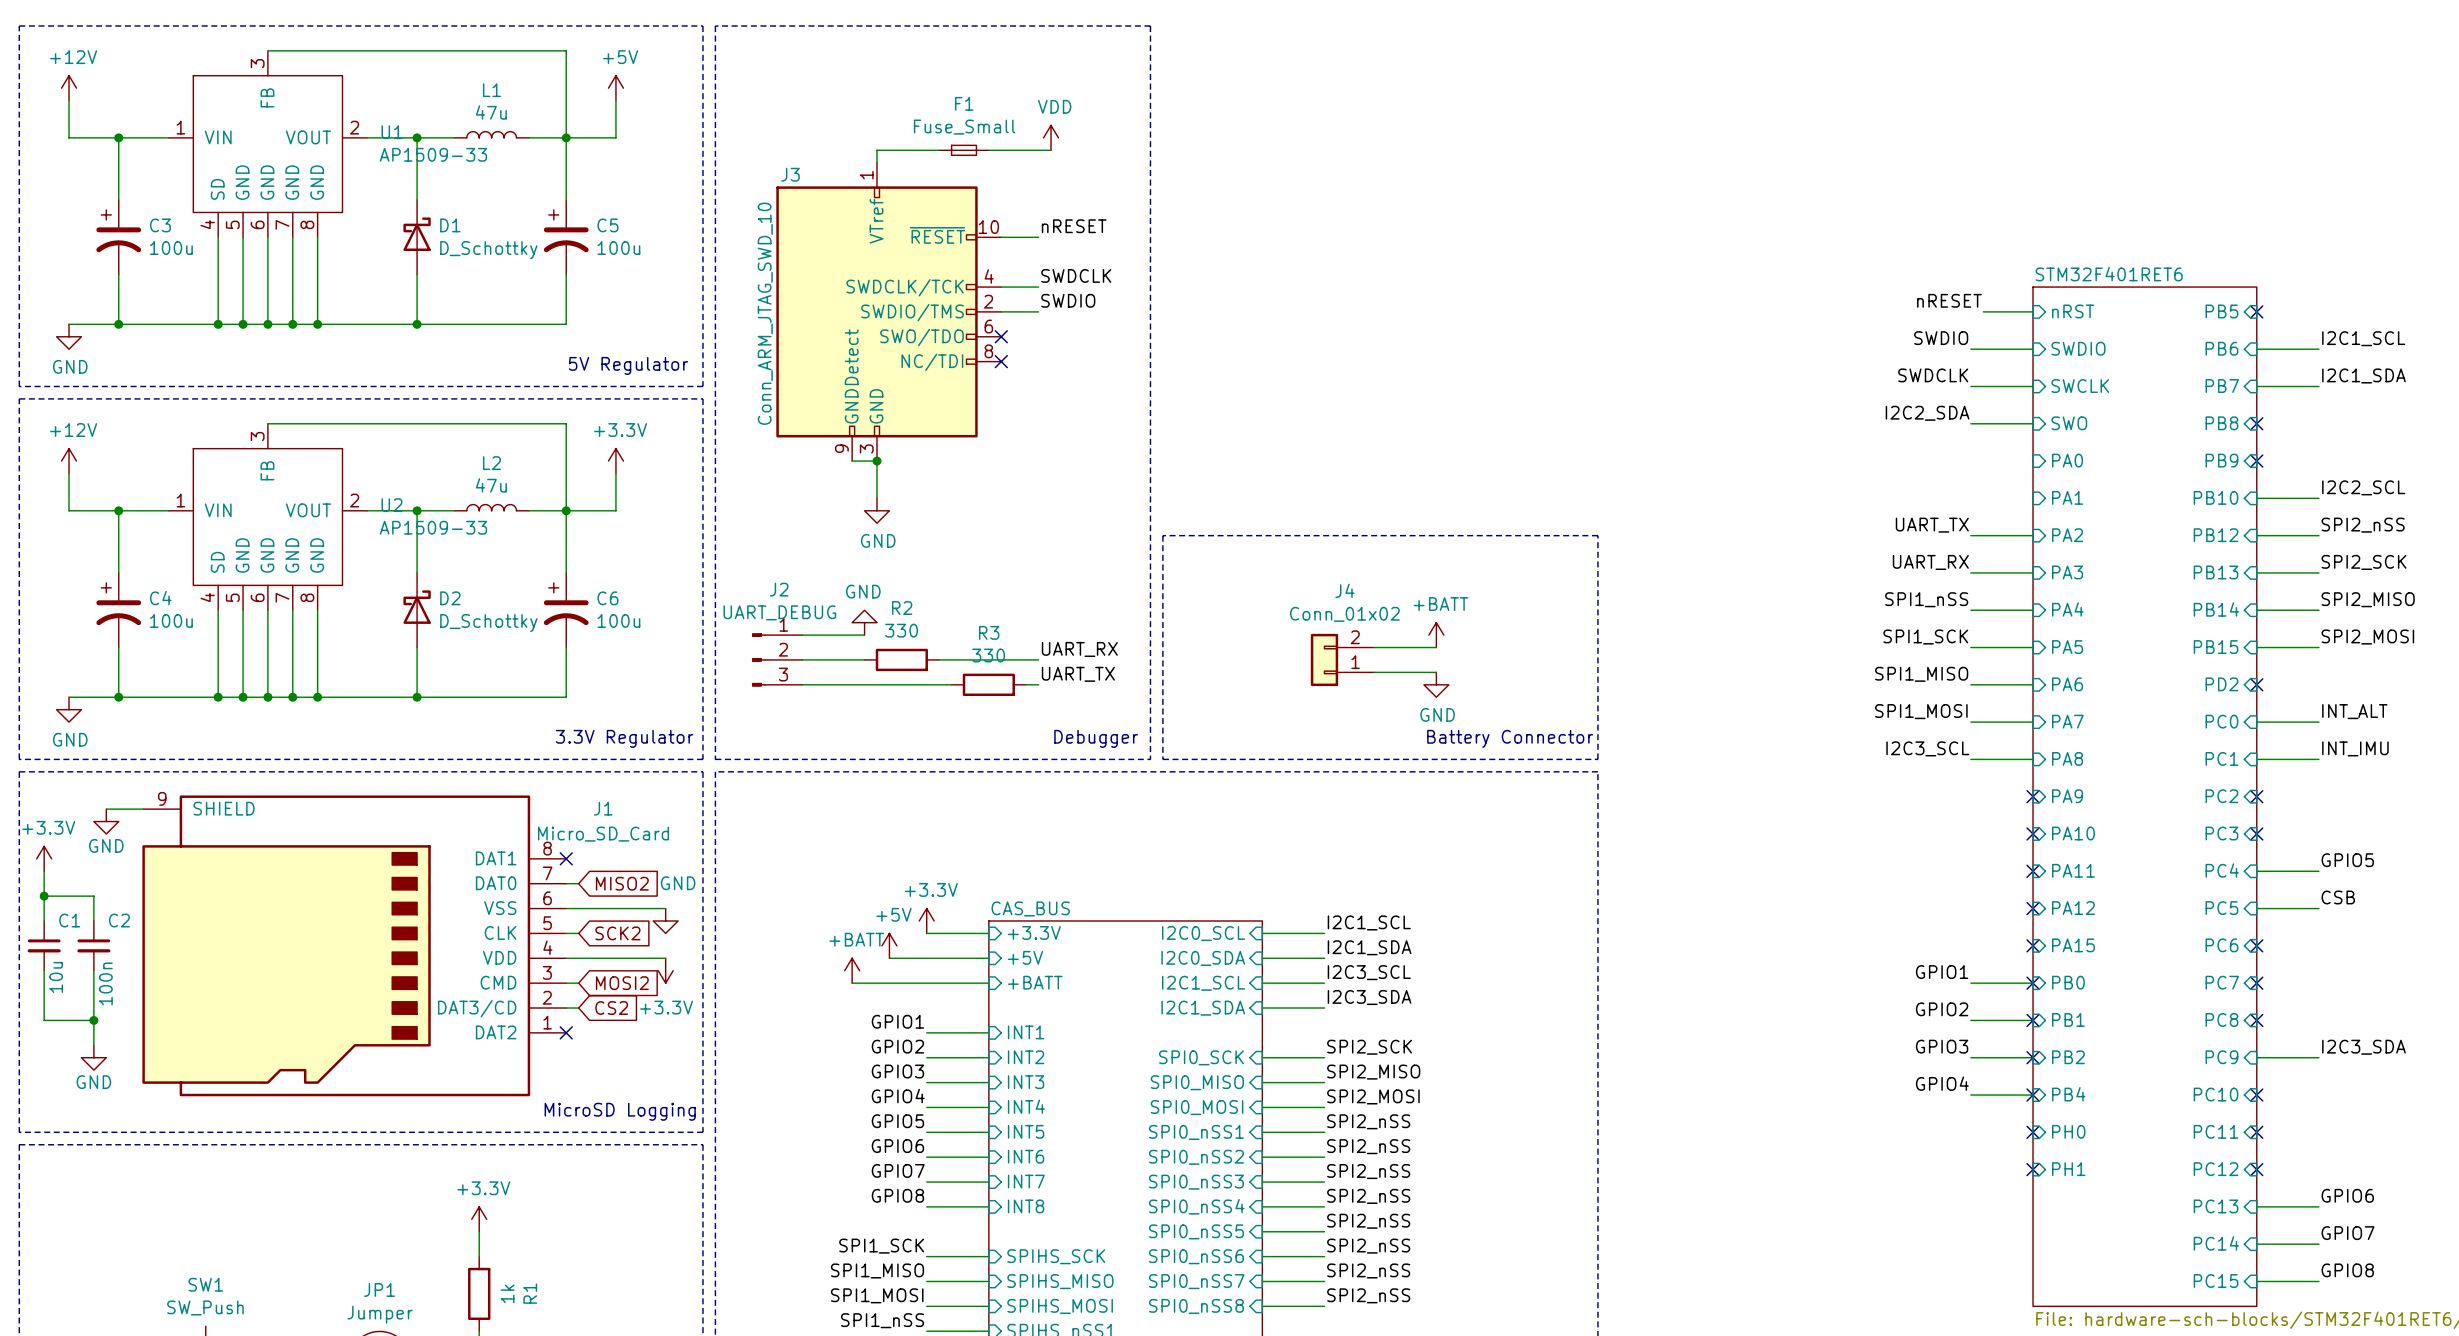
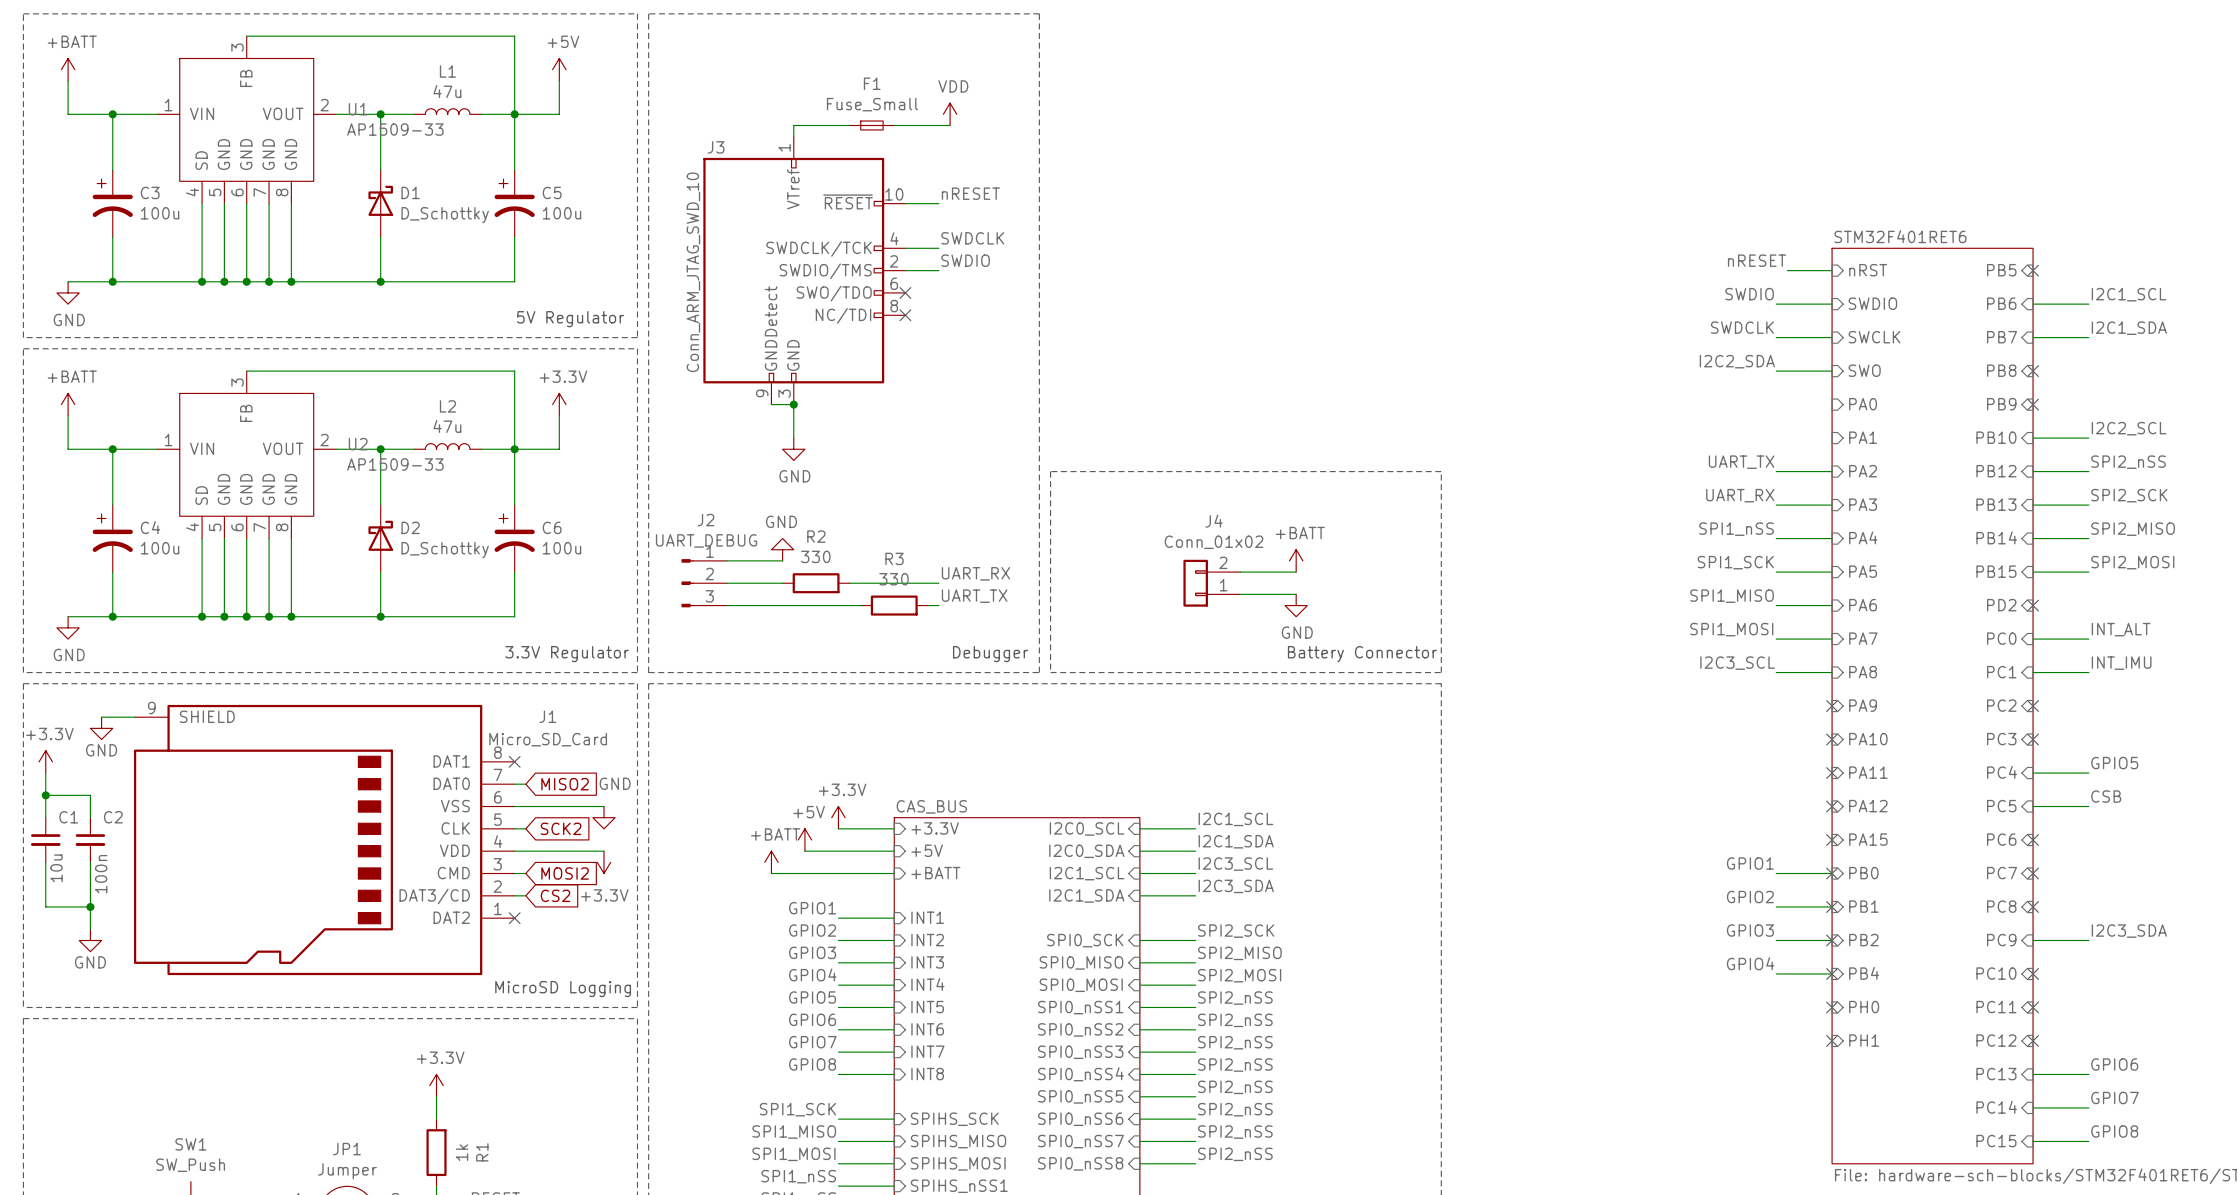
power symbol: +12V (69, 88) -> +BATT (68, 69)
power symbol: +12V (69, 461) -> +BATT (68, 404)

